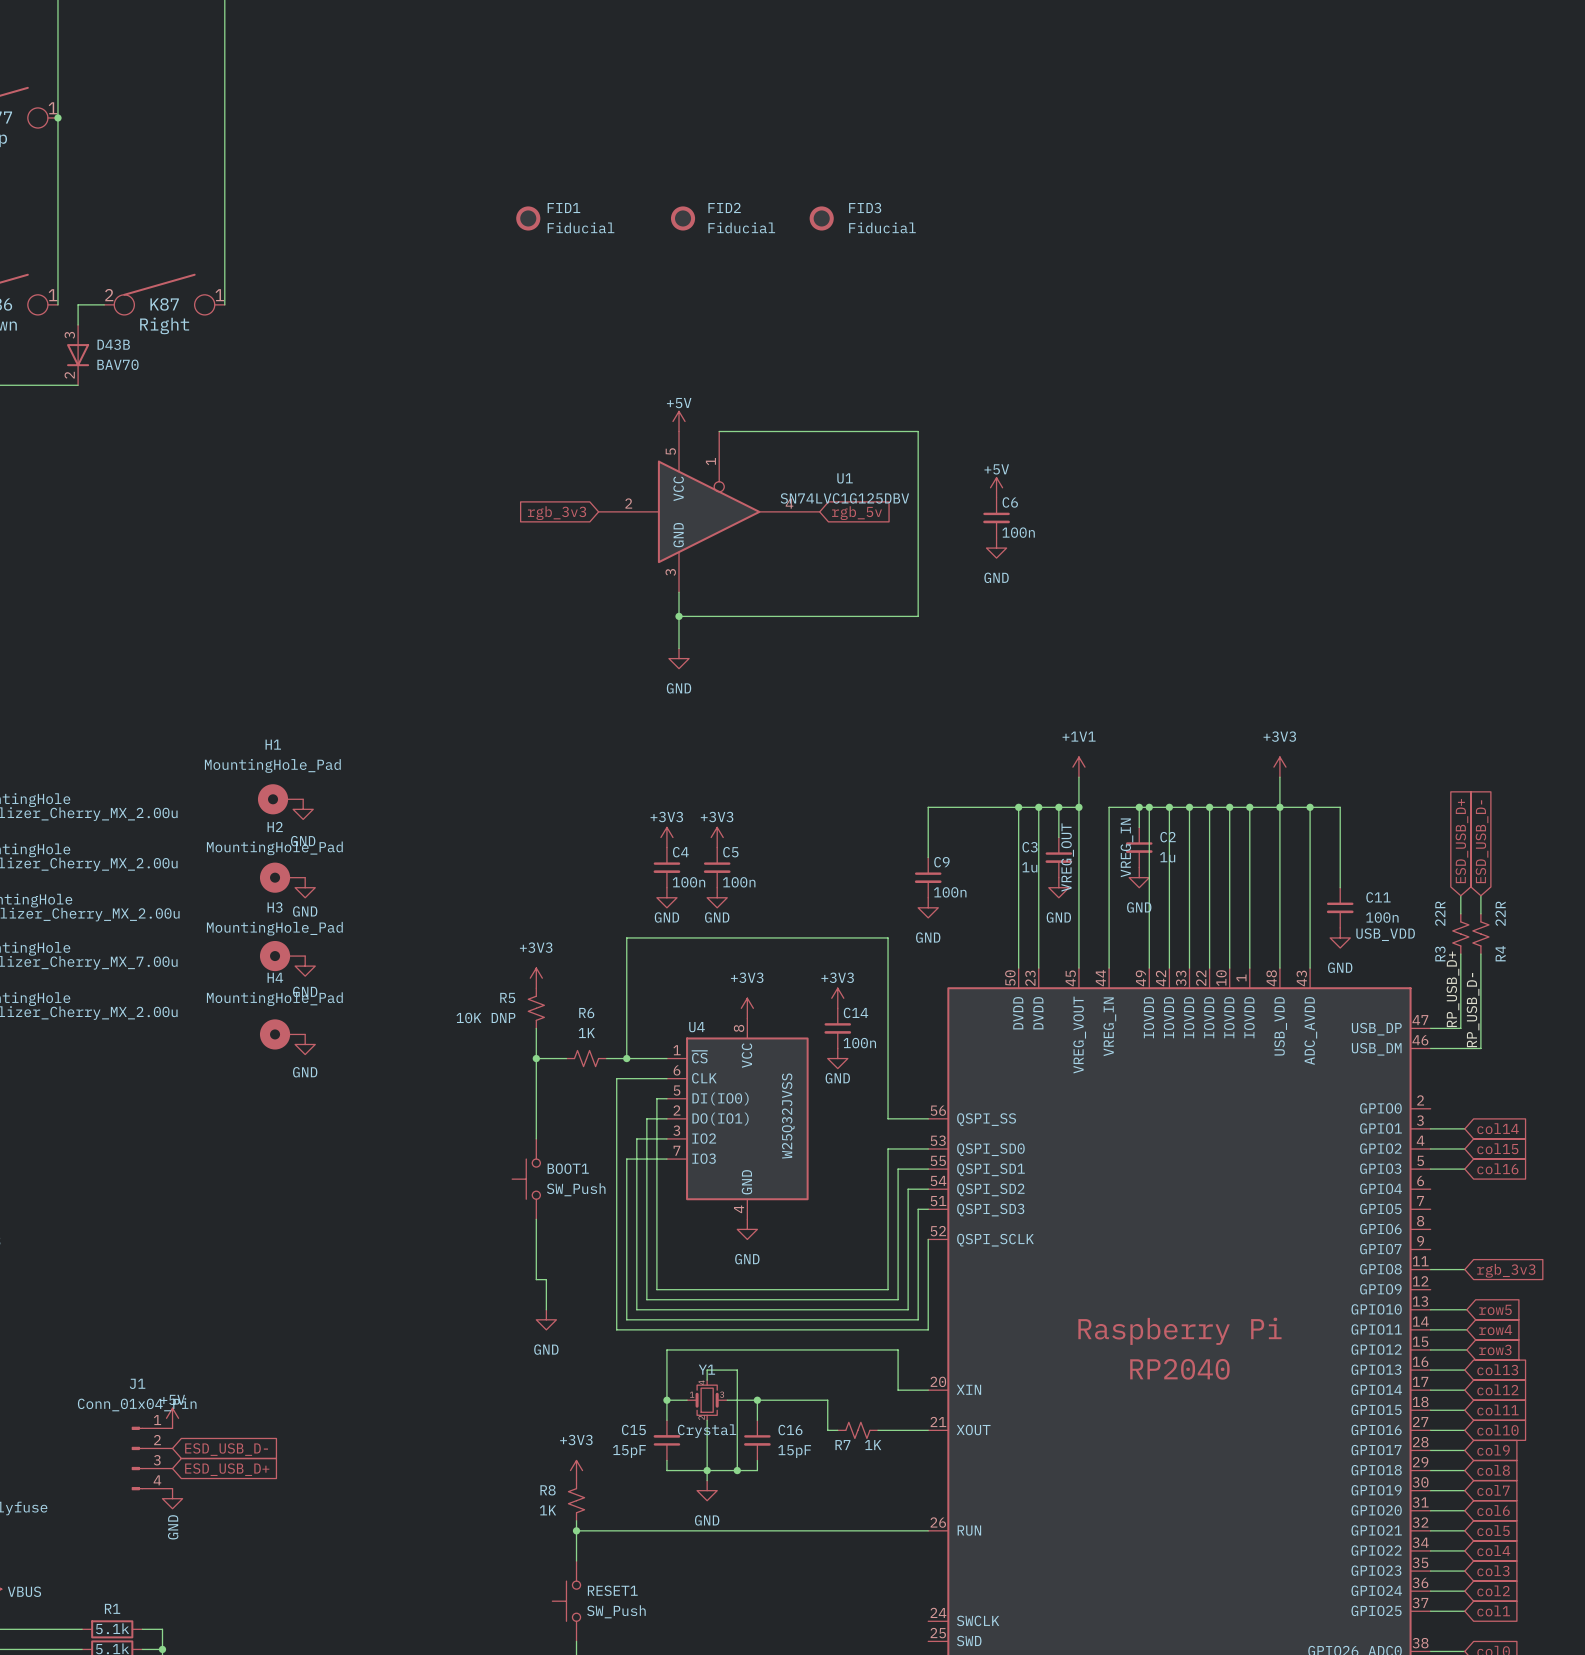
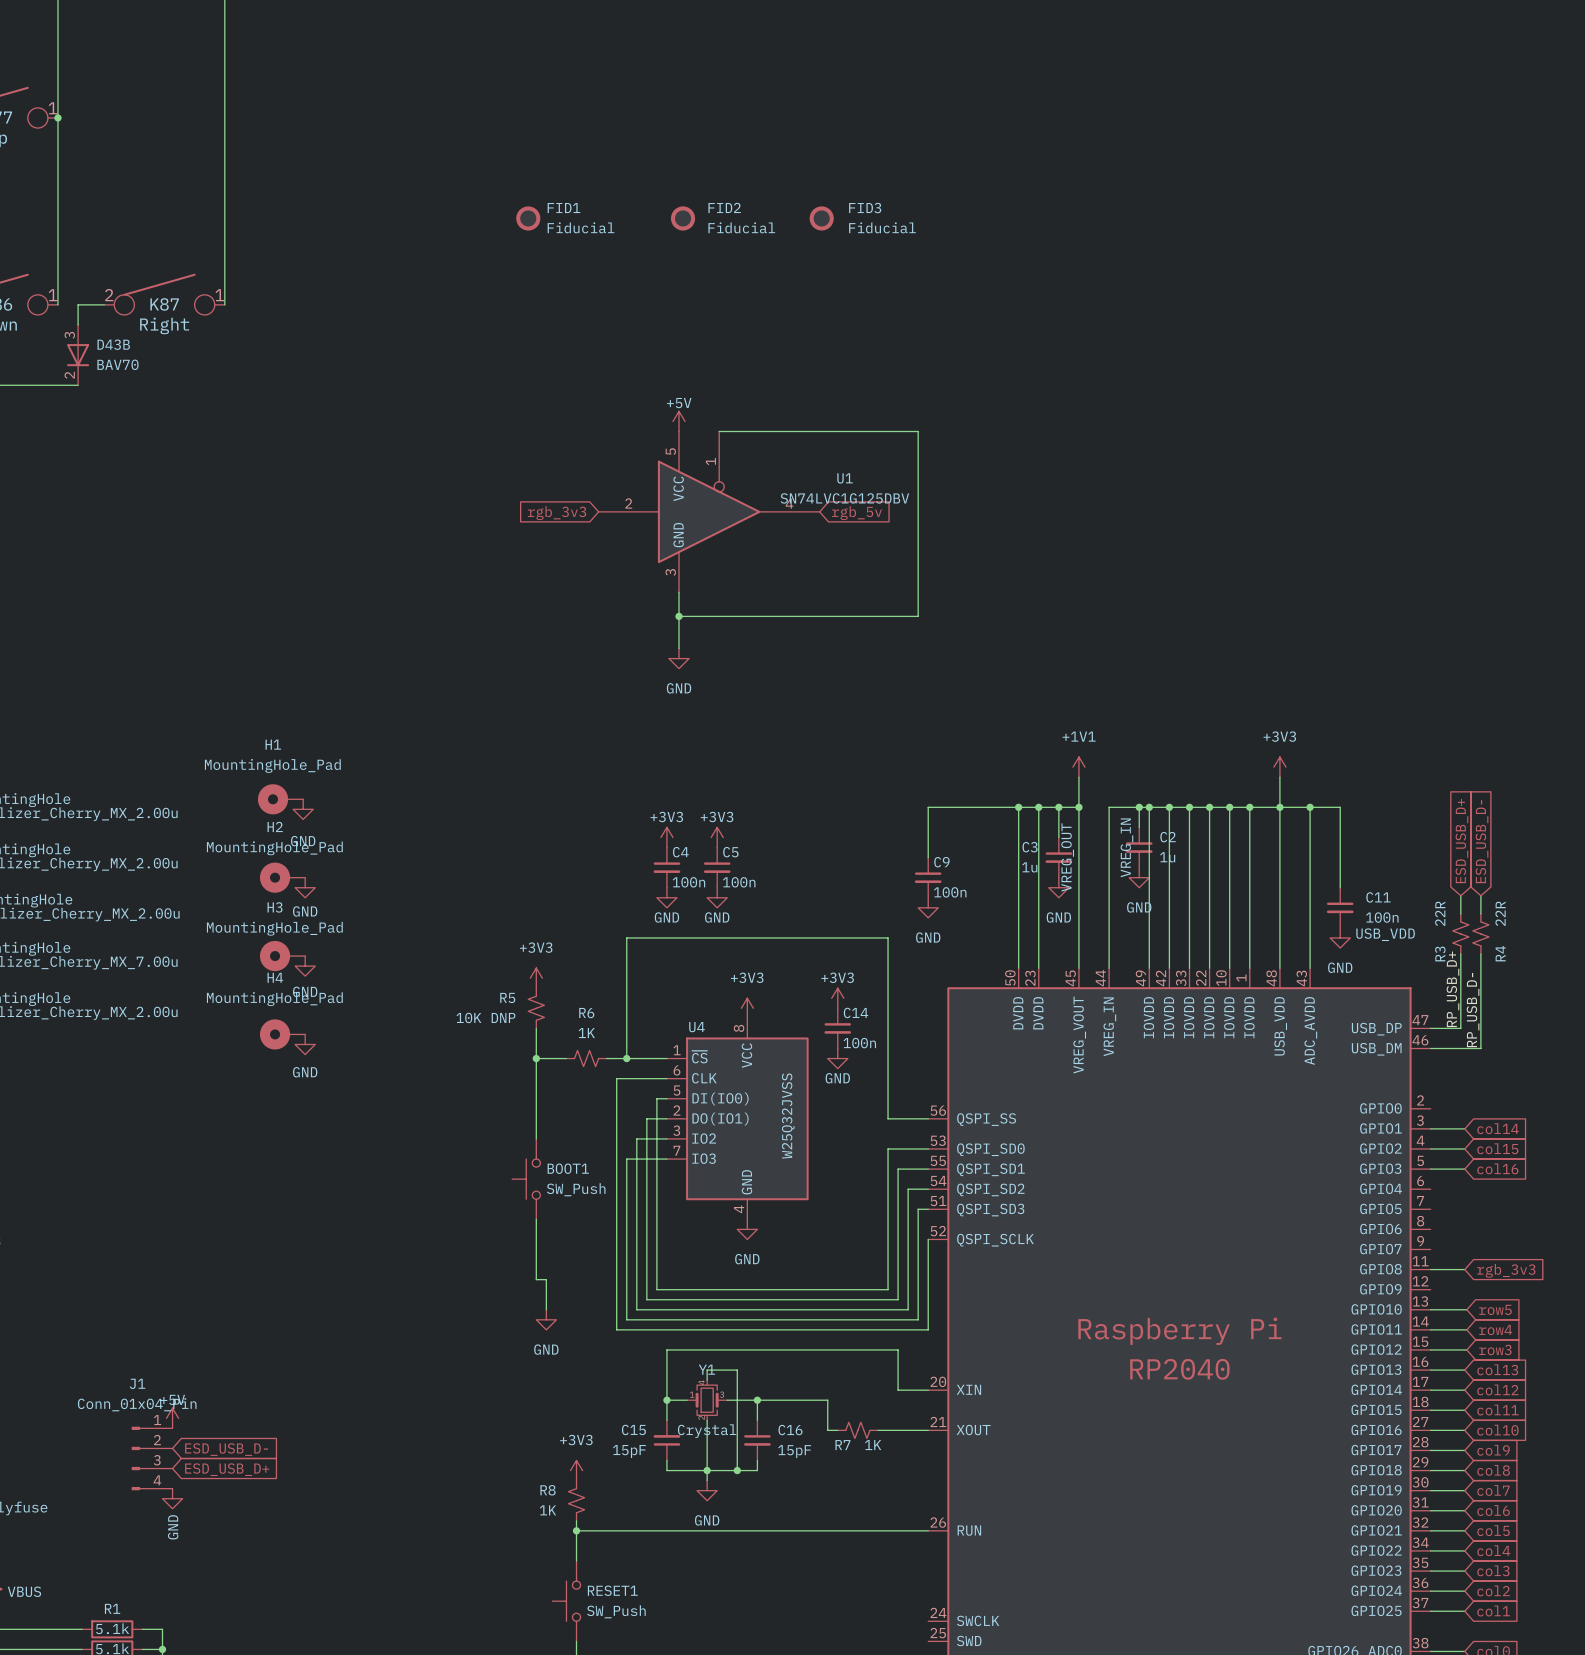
power symbol: +5V (996, 487) -> none
C6: 100n (996, 517) -> none
power symbol: GND (996, 548) -> none

